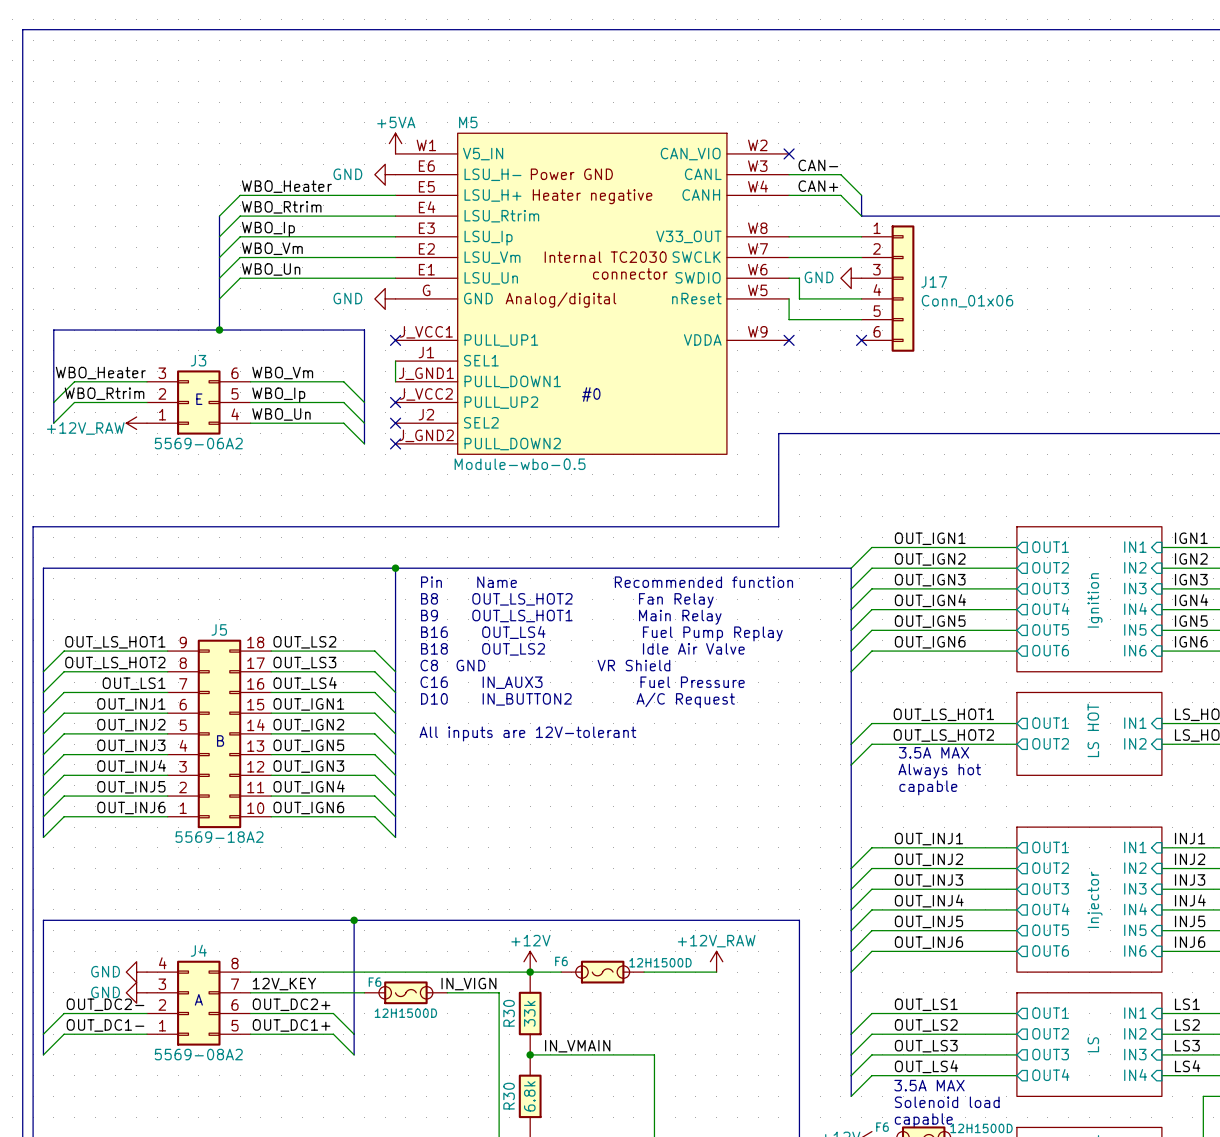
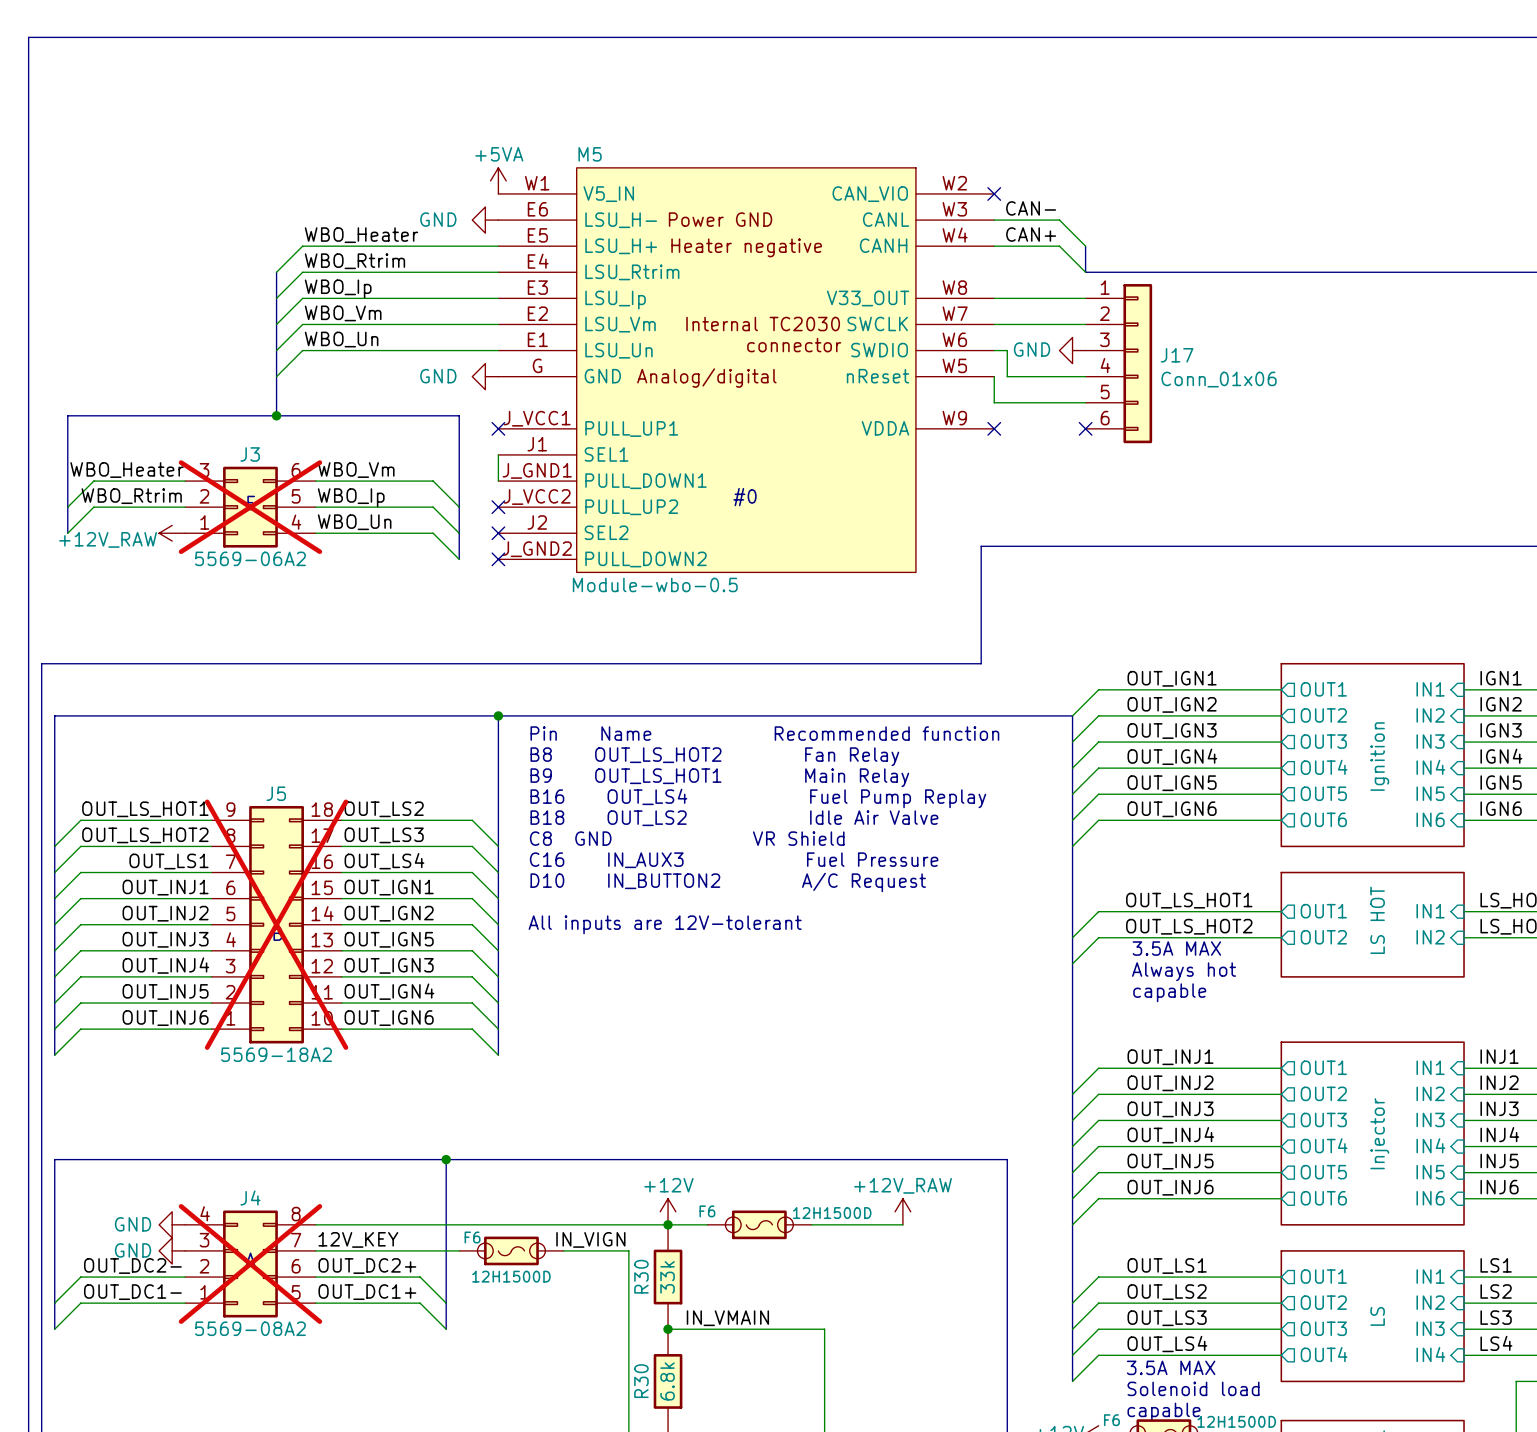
J3 do-not-place cross: none -> (250, 507)
J5 do-not-place cross: none -> (276, 924)
J4 do-not-place cross: none -> (250, 1263)

